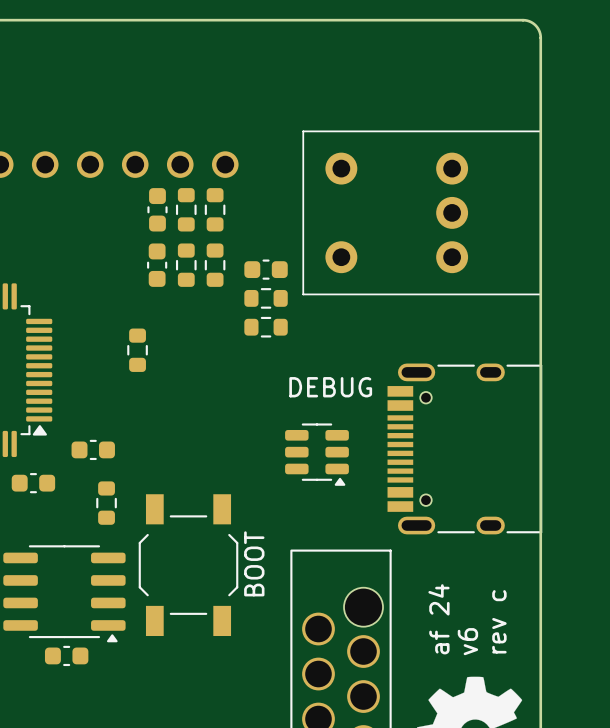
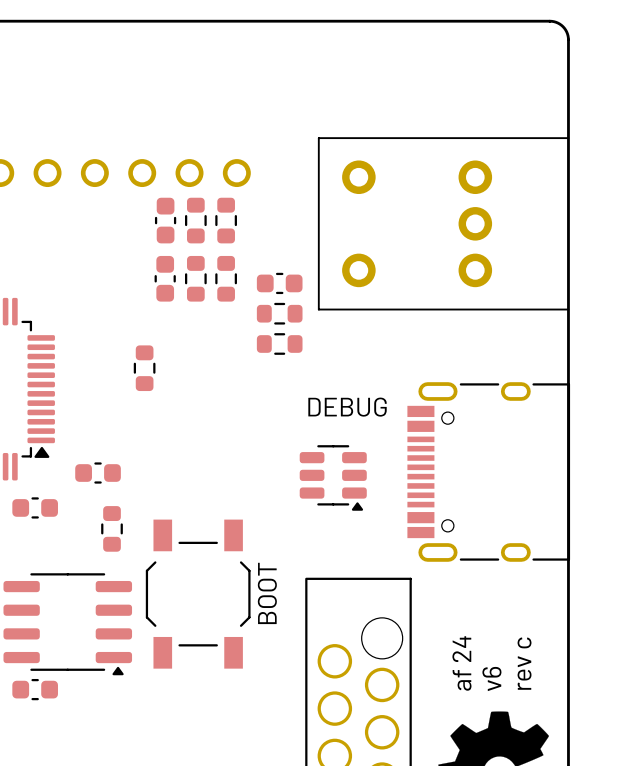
part position: (66, 655) -> (35, 689)

